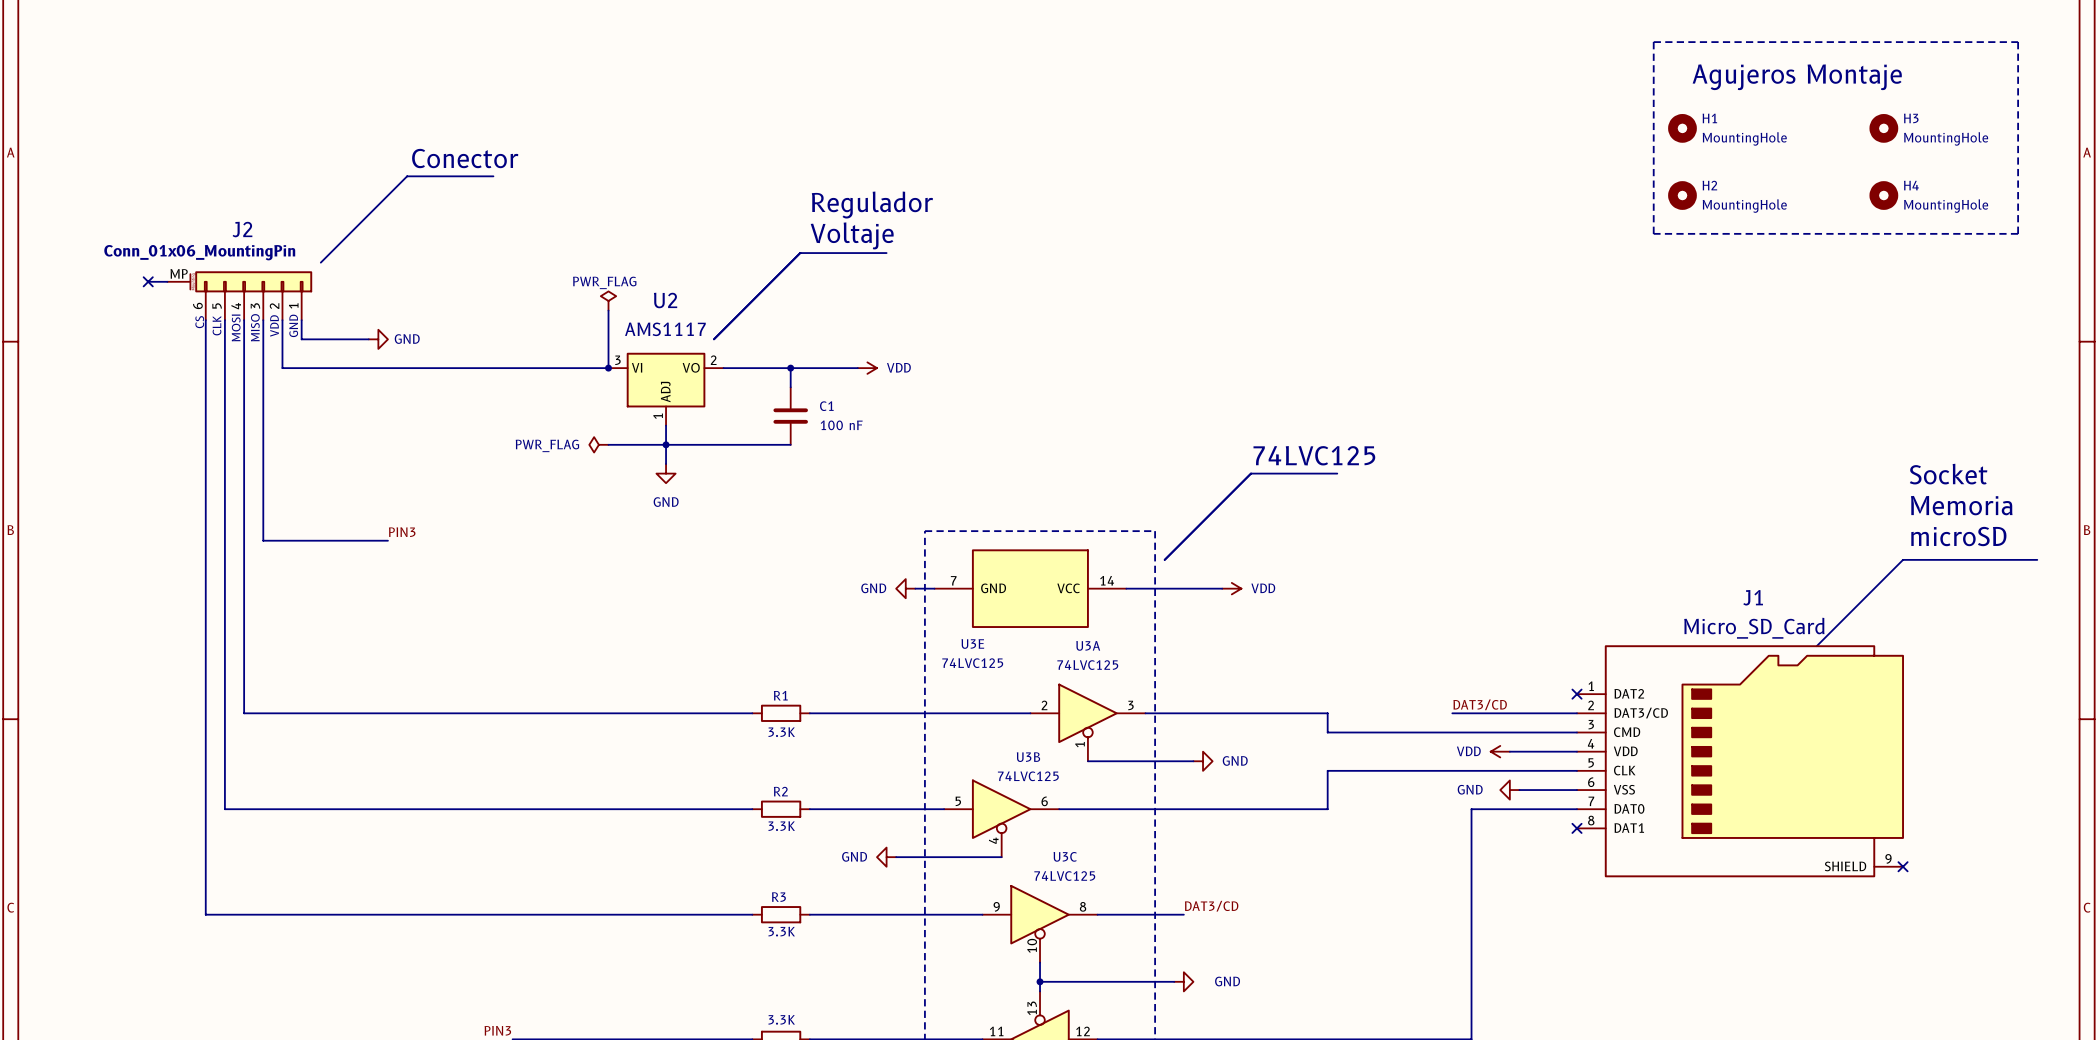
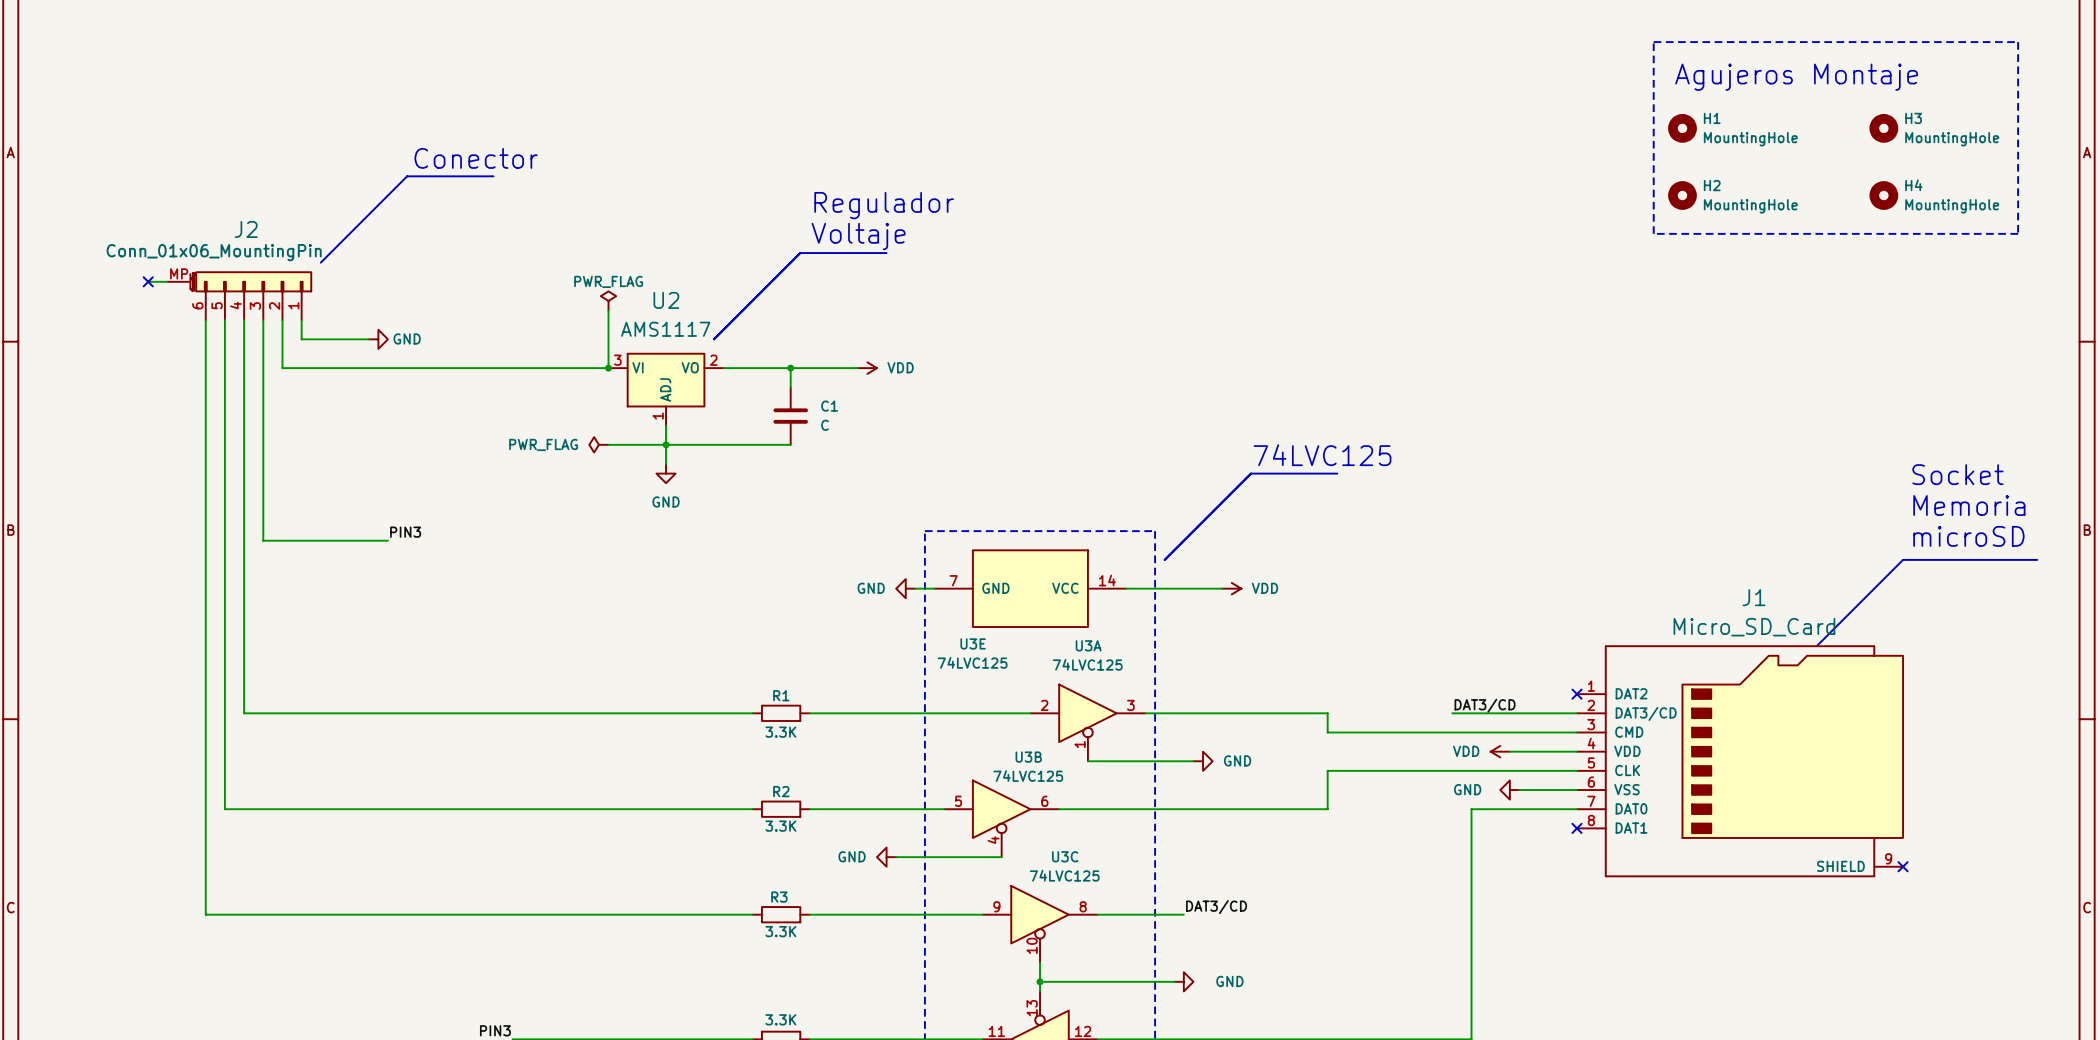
text: CS (199, 322) -> none
text: CLK (216, 325) -> none
text: VDD (274, 325) -> none
text: GND (293, 325) -> none
text: MOSI (236, 327) -> none
text: MISO (255, 327) -> none
C1 value: 100 nF (841, 425) -> C (825, 425)

